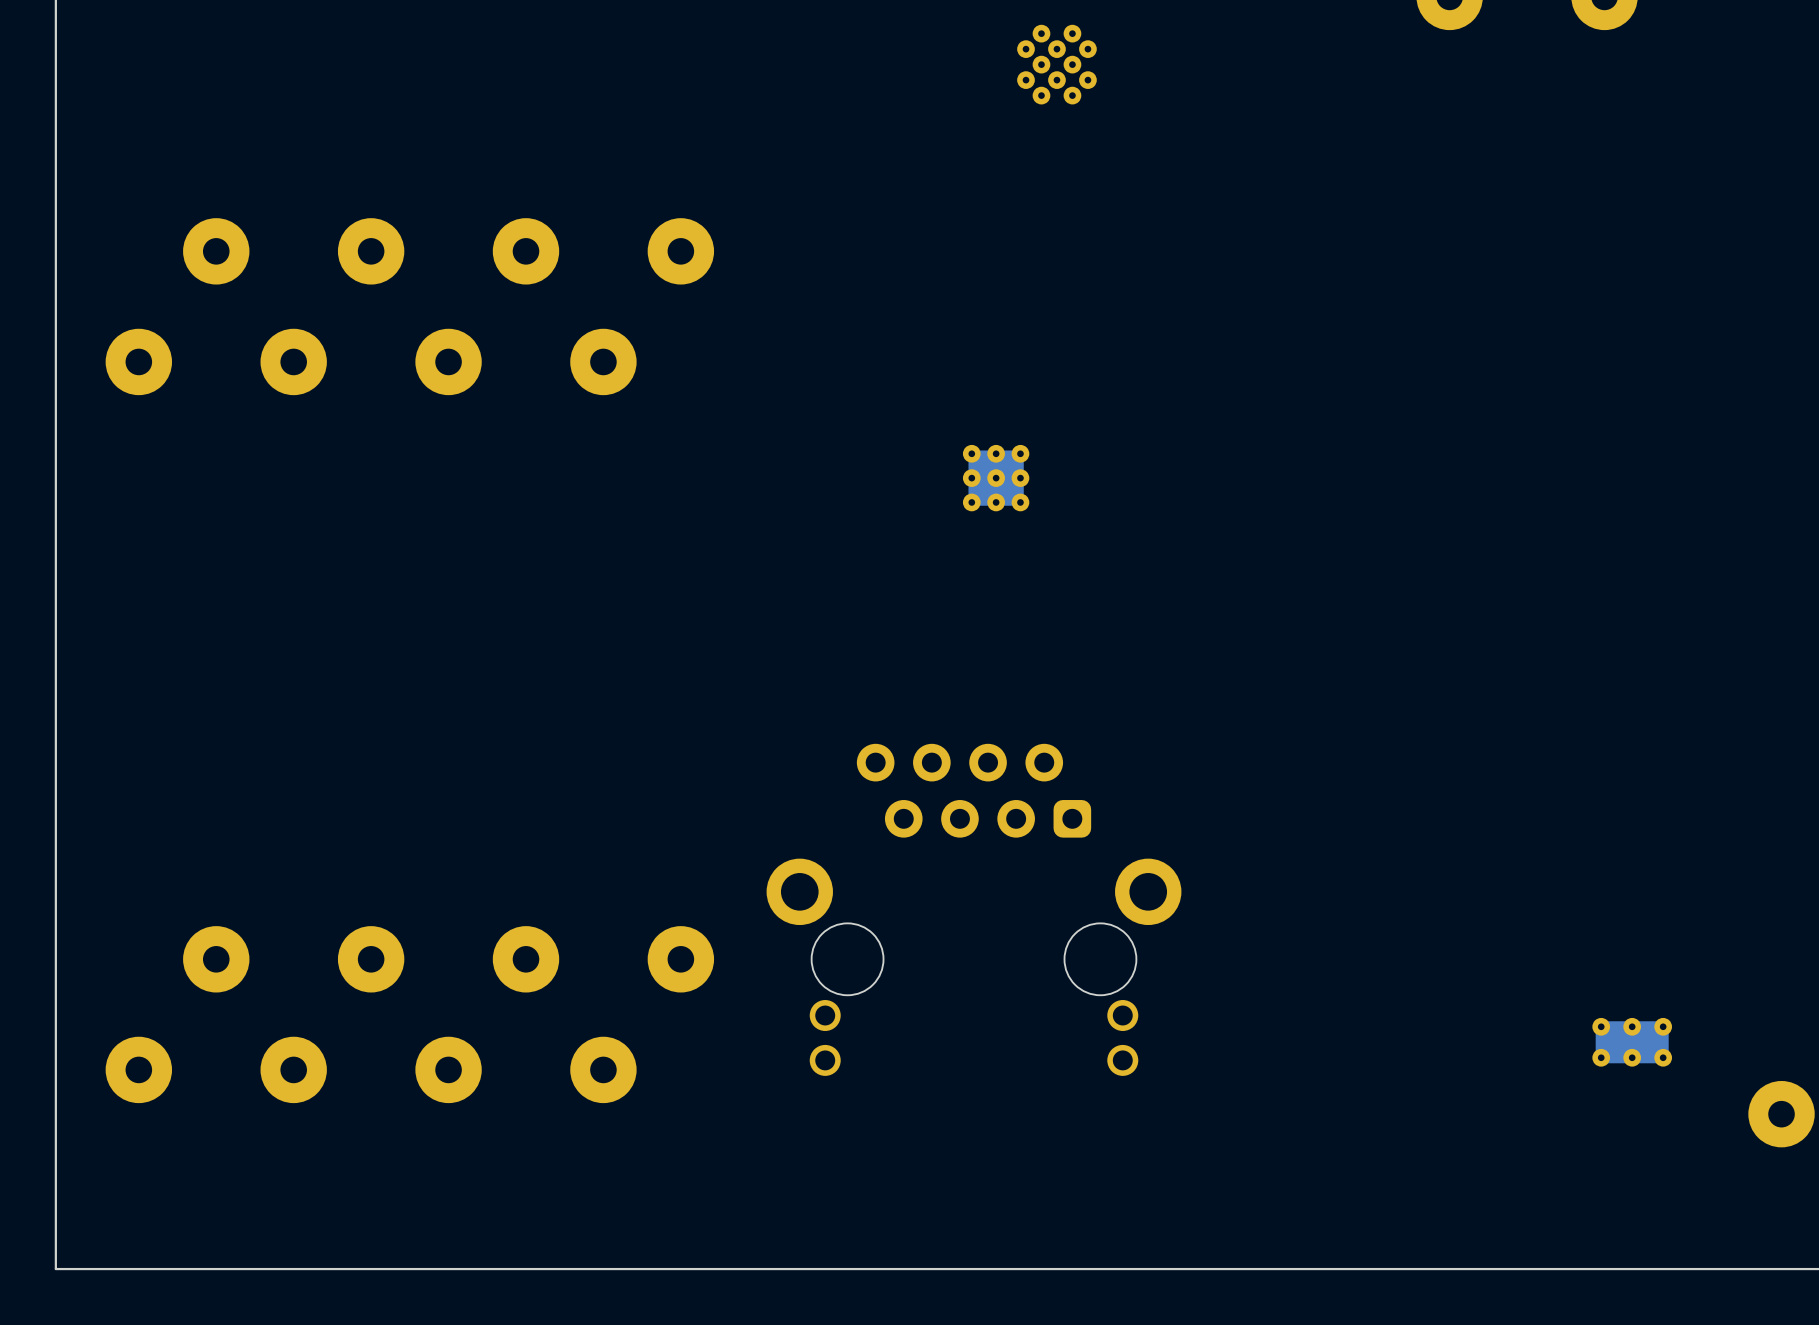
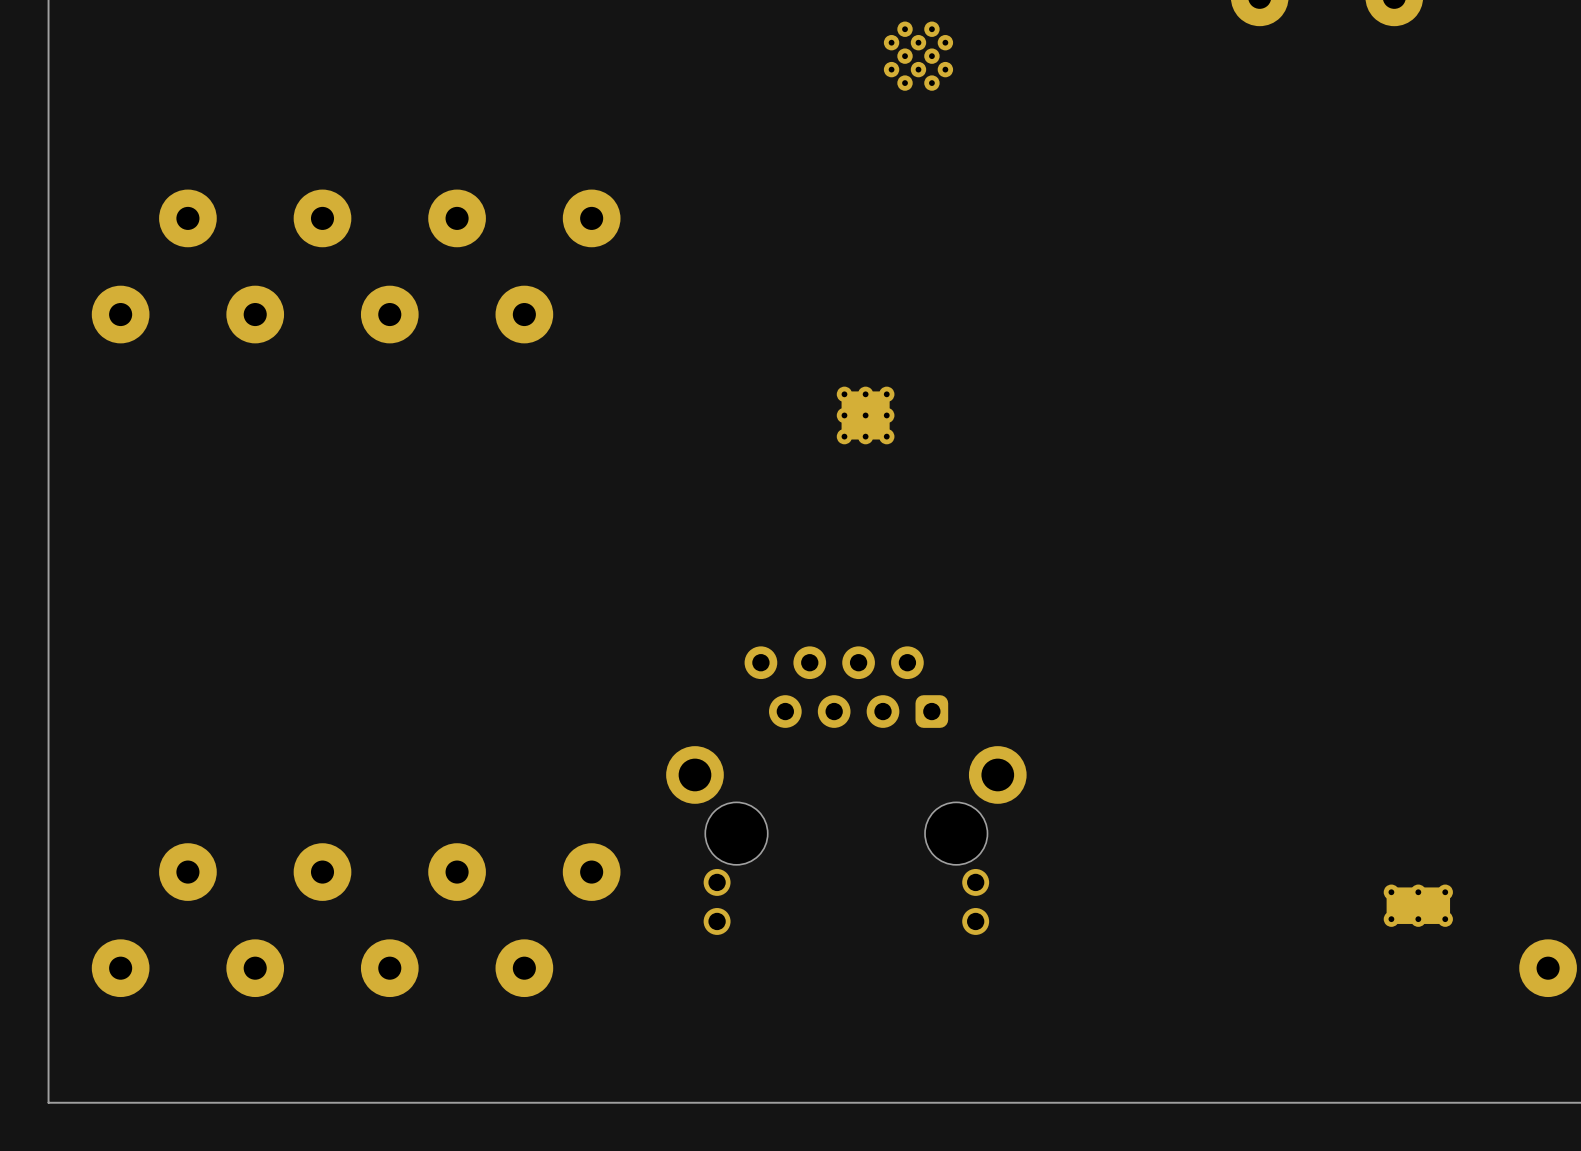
part position: (409, 1014) -> (356, 920)

